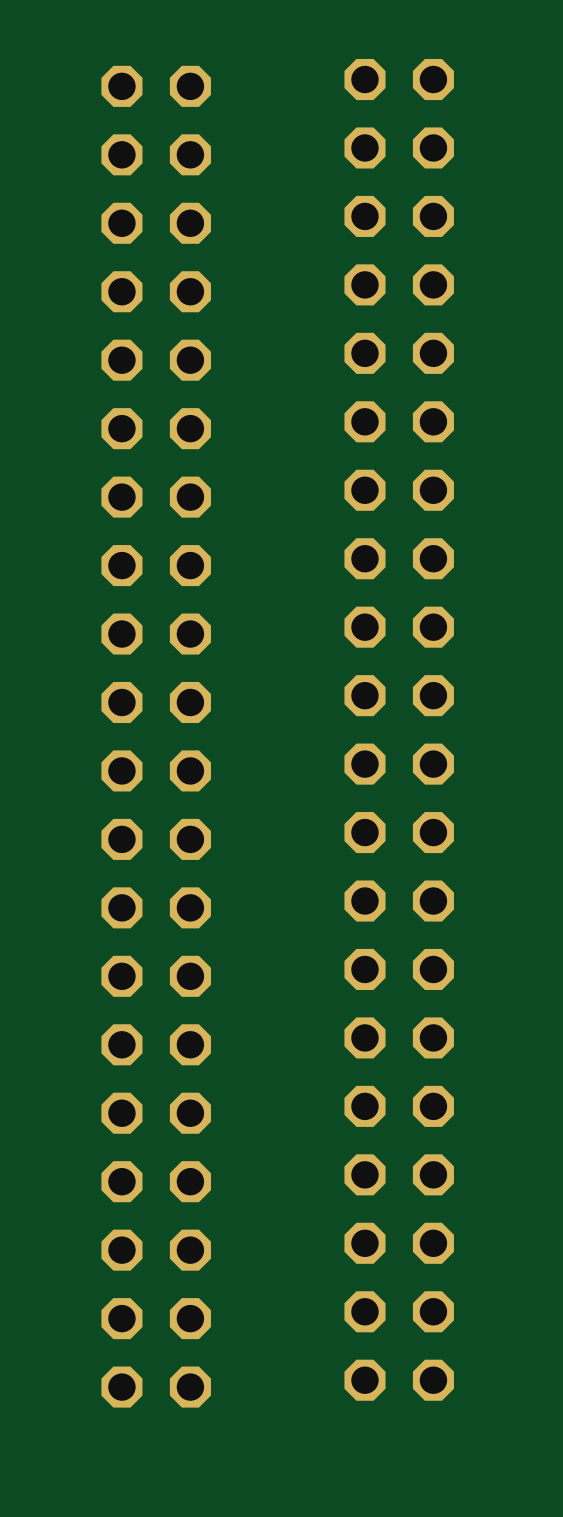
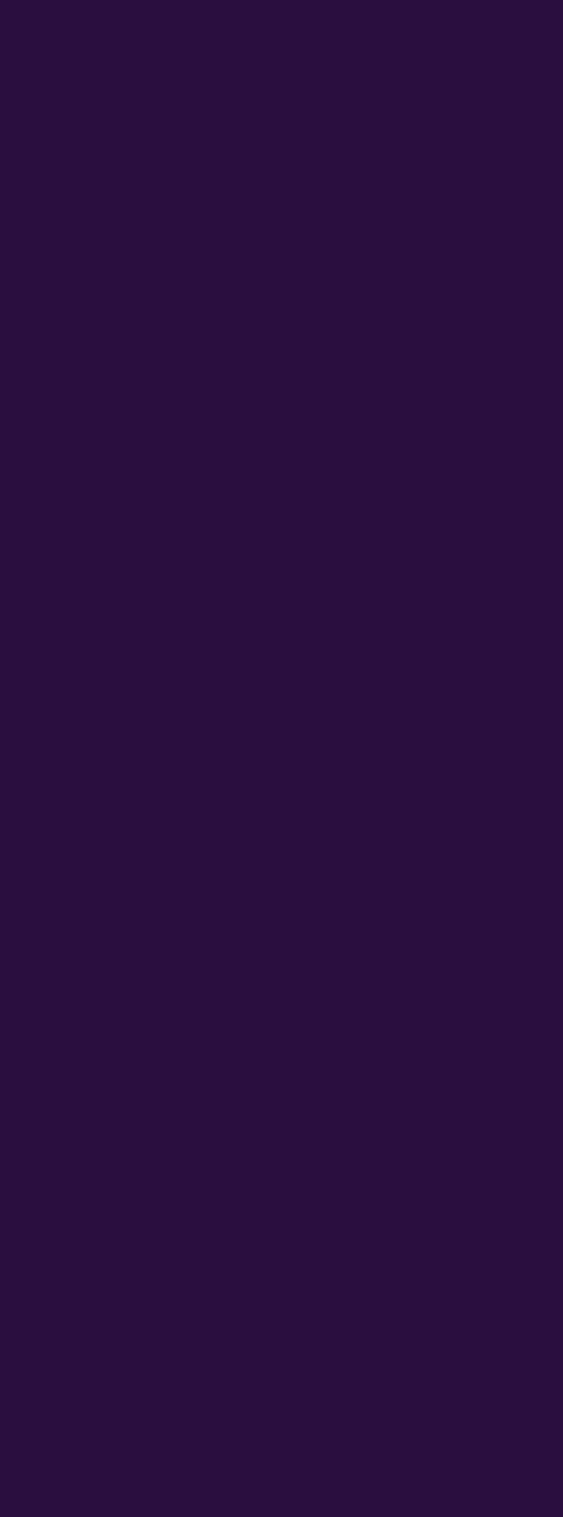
part: (399, 729) -> none
part: (156, 736) -> none

